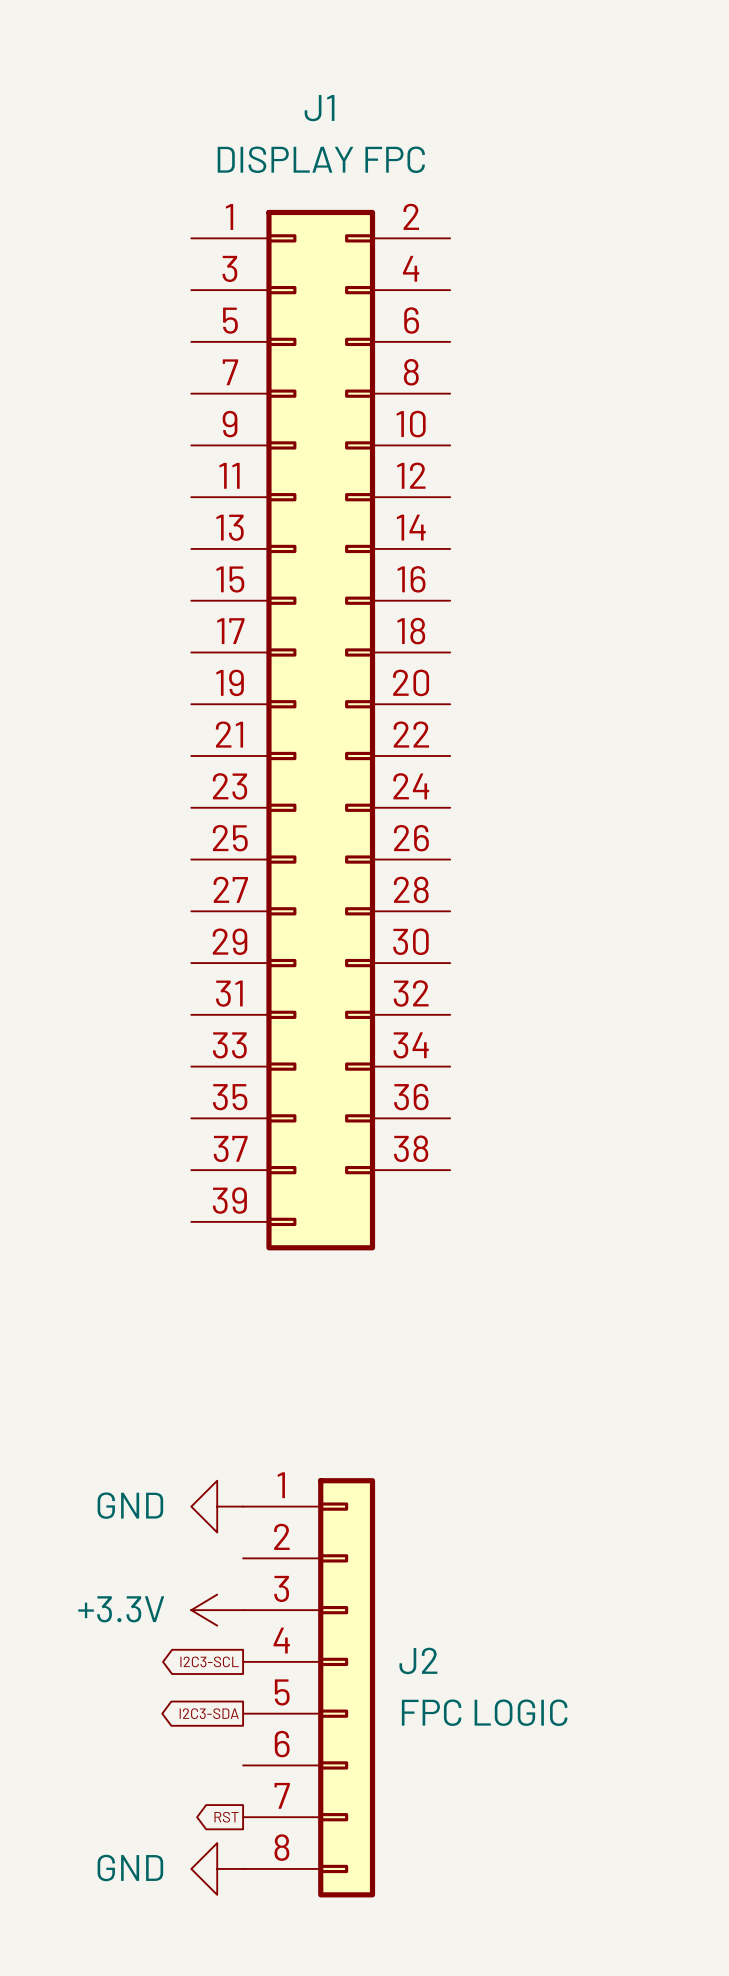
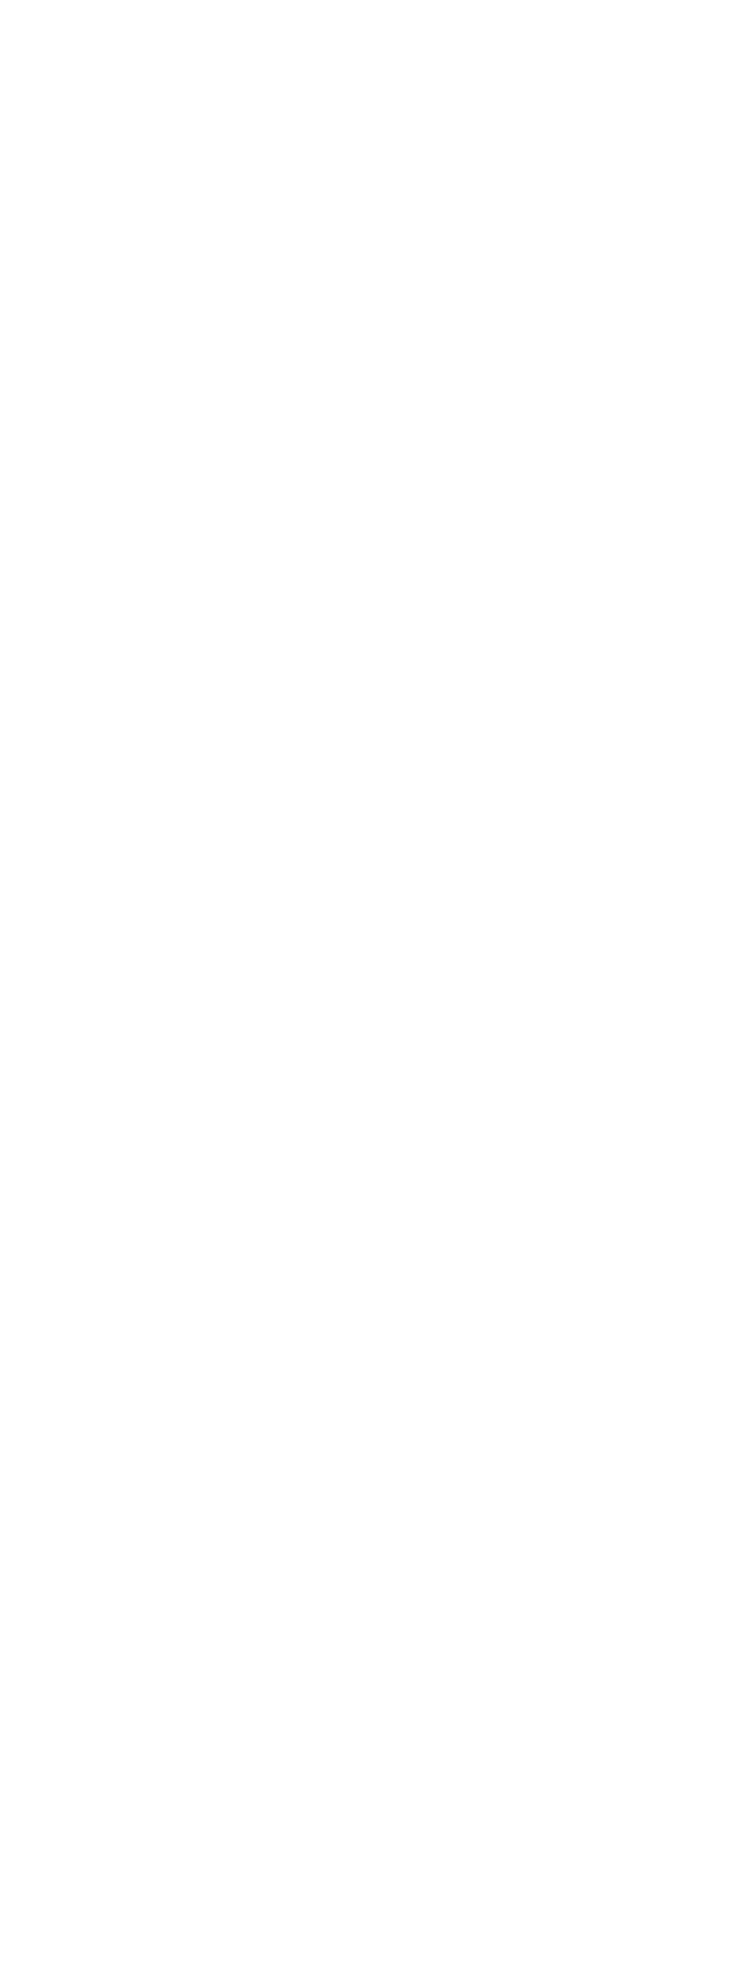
J1: DISPLAY FPC (320, 730) -> none
power symbol: GND (217, 1506) -> none
power symbol: +3.3V (217, 1610) -> none
global label: I2C3-SCL (209, 1661) -> none
J2: FPC LOGIC (309, 1687) -> none
global label: I2C3-SDA (209, 1713) -> none
global label: RST (226, 1817) -> none
power symbol: GND (217, 1868) -> none

